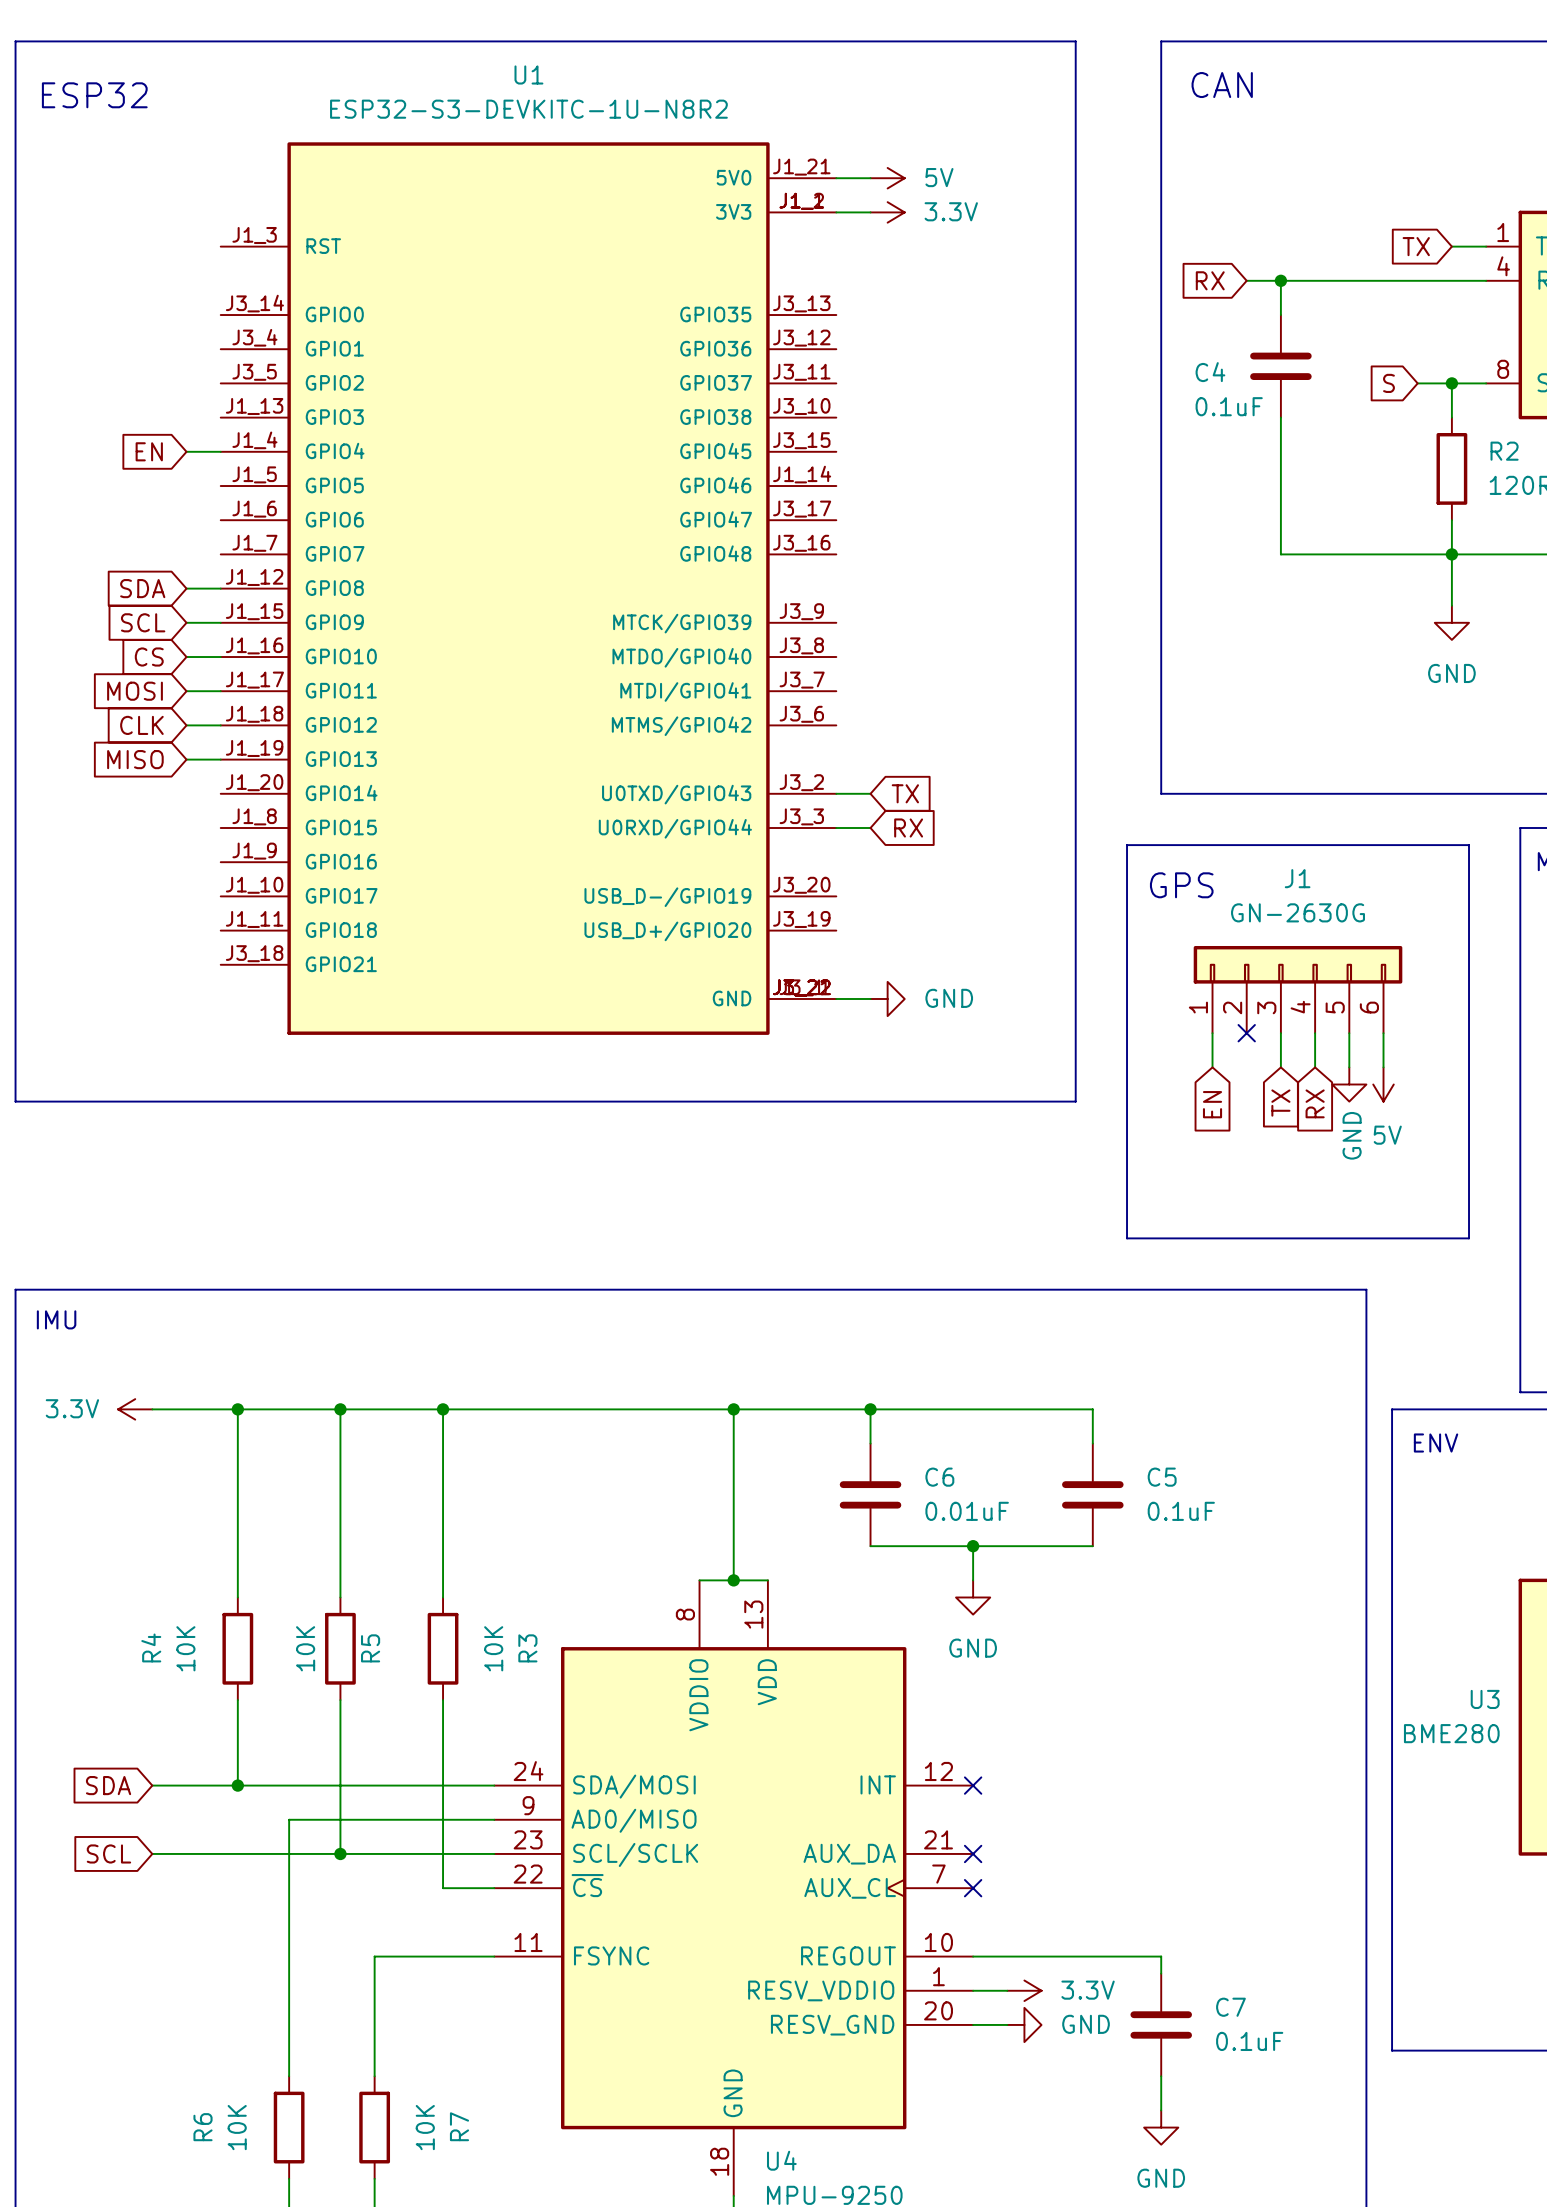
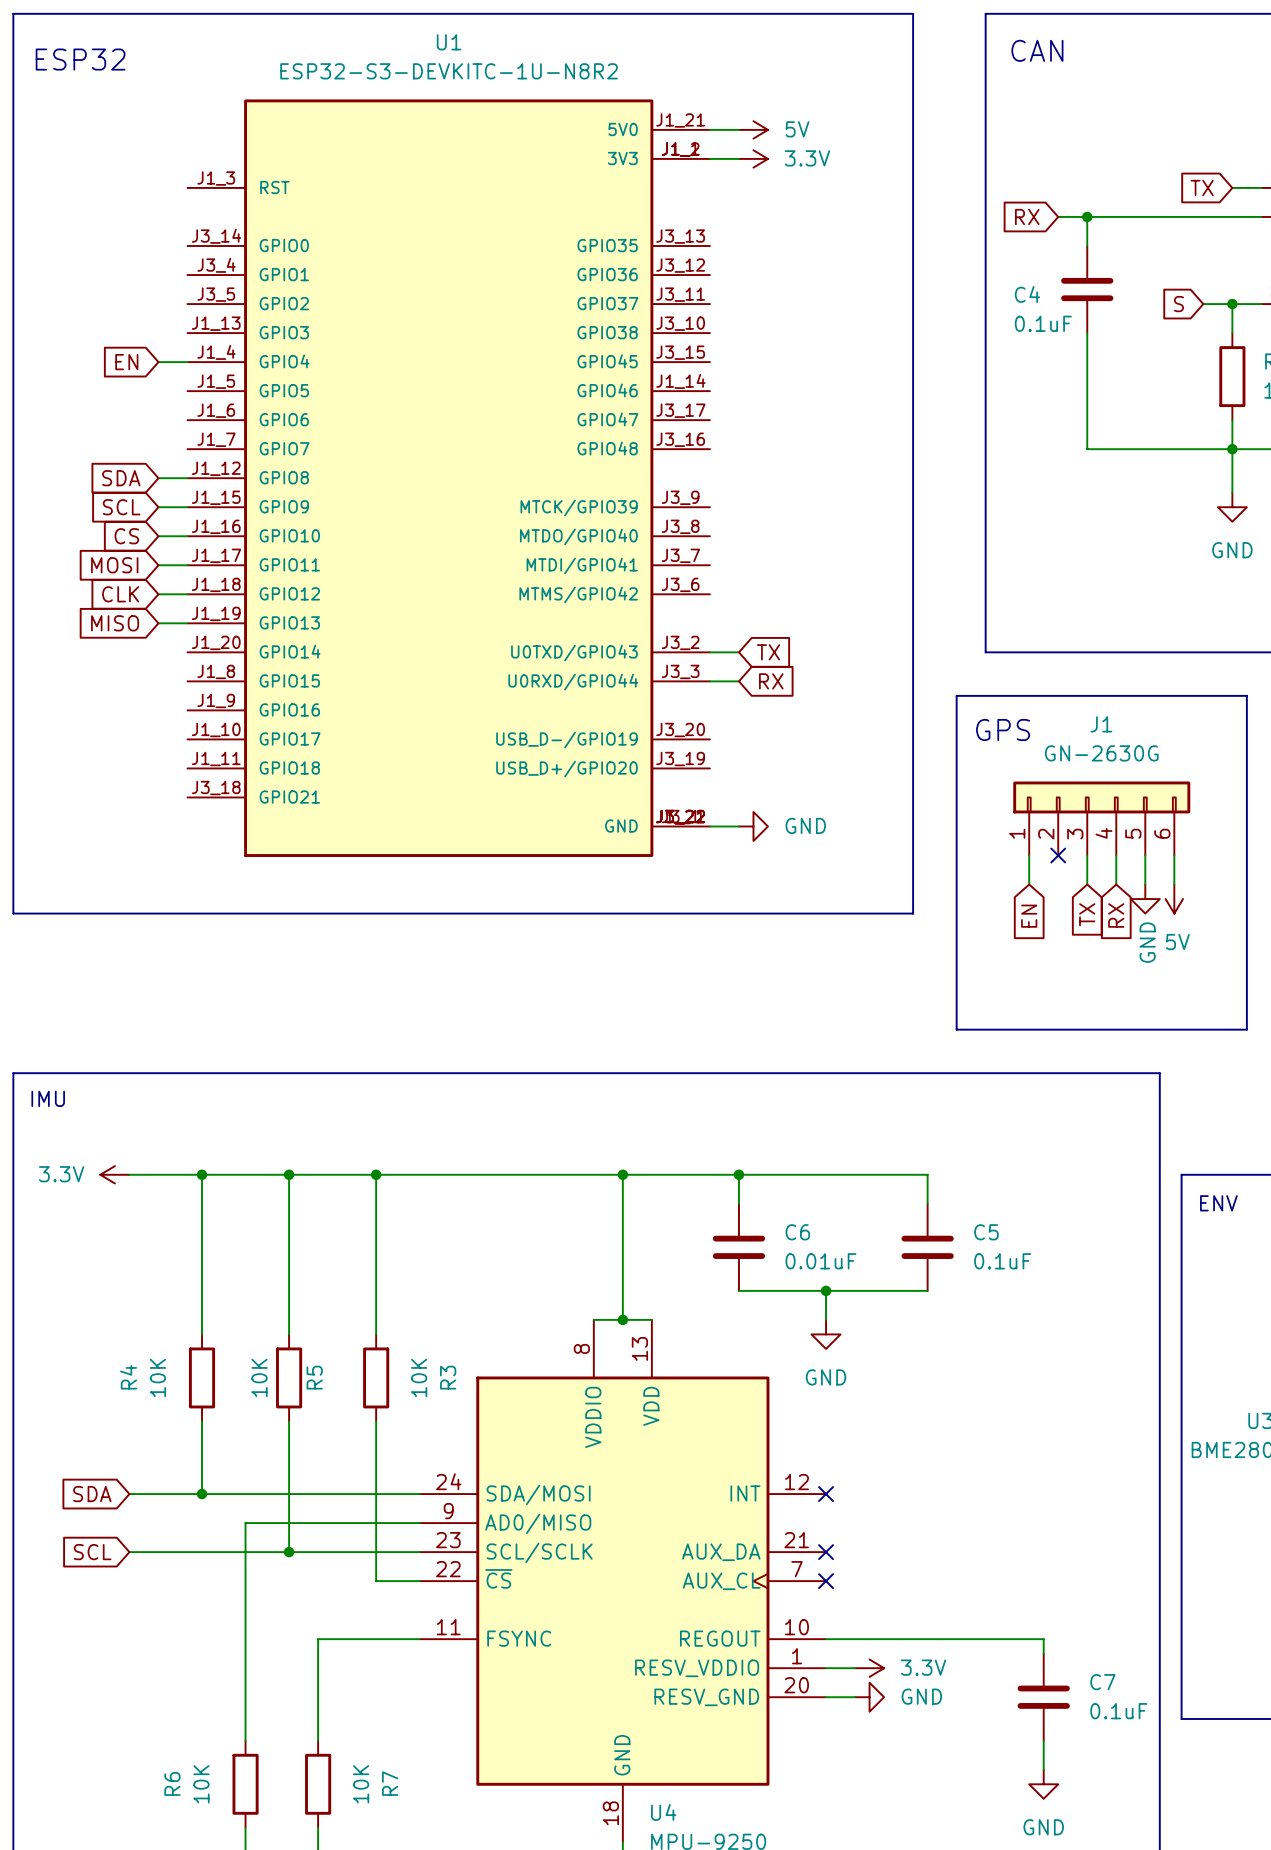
wire: (1161, 1956) (1161, 1973) -> (985, 1639) (1043, 1639) (1043, 1653)
C7 position: (1161, 2024) -> (1043, 1697)
wire: (1161, 2076) (1161, 2110) -> (1043, 1740) (1043, 1769)
power symbol position: GND (1161, 2127) -> GND (1043, 1784)

